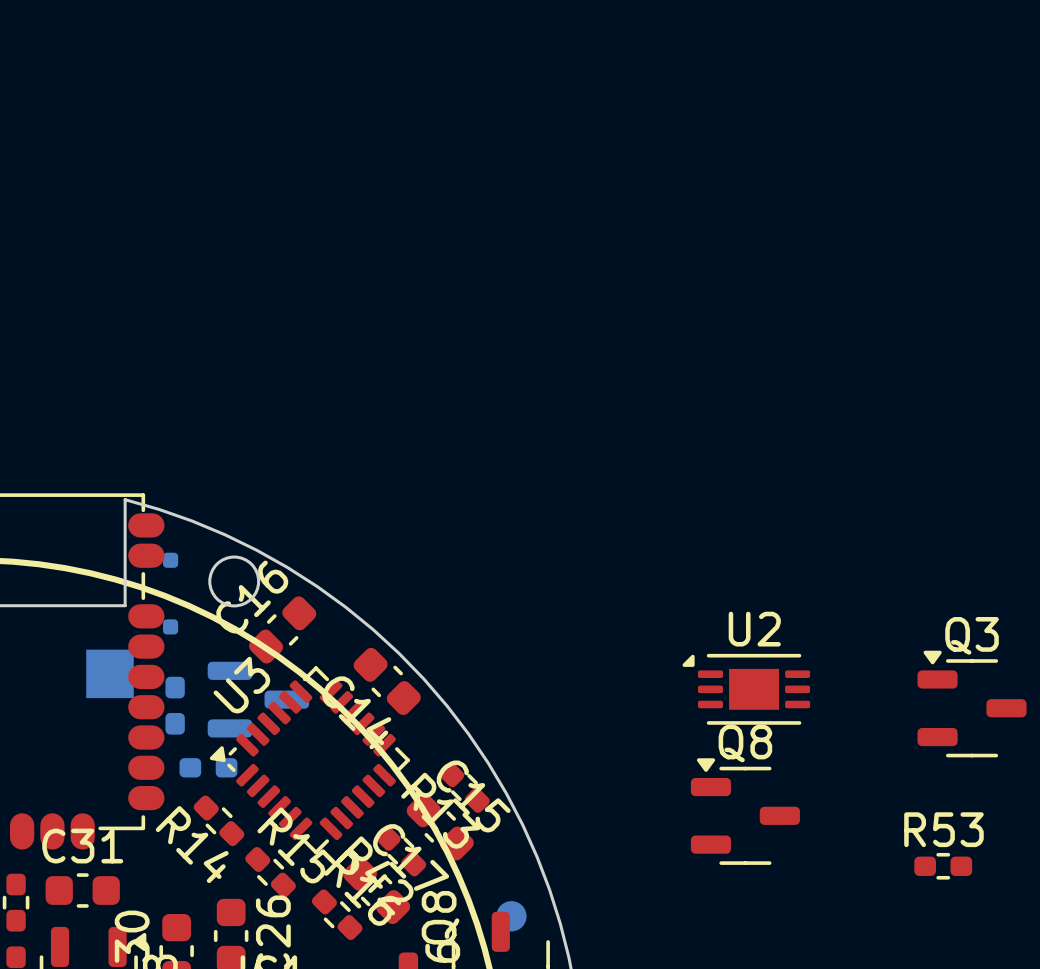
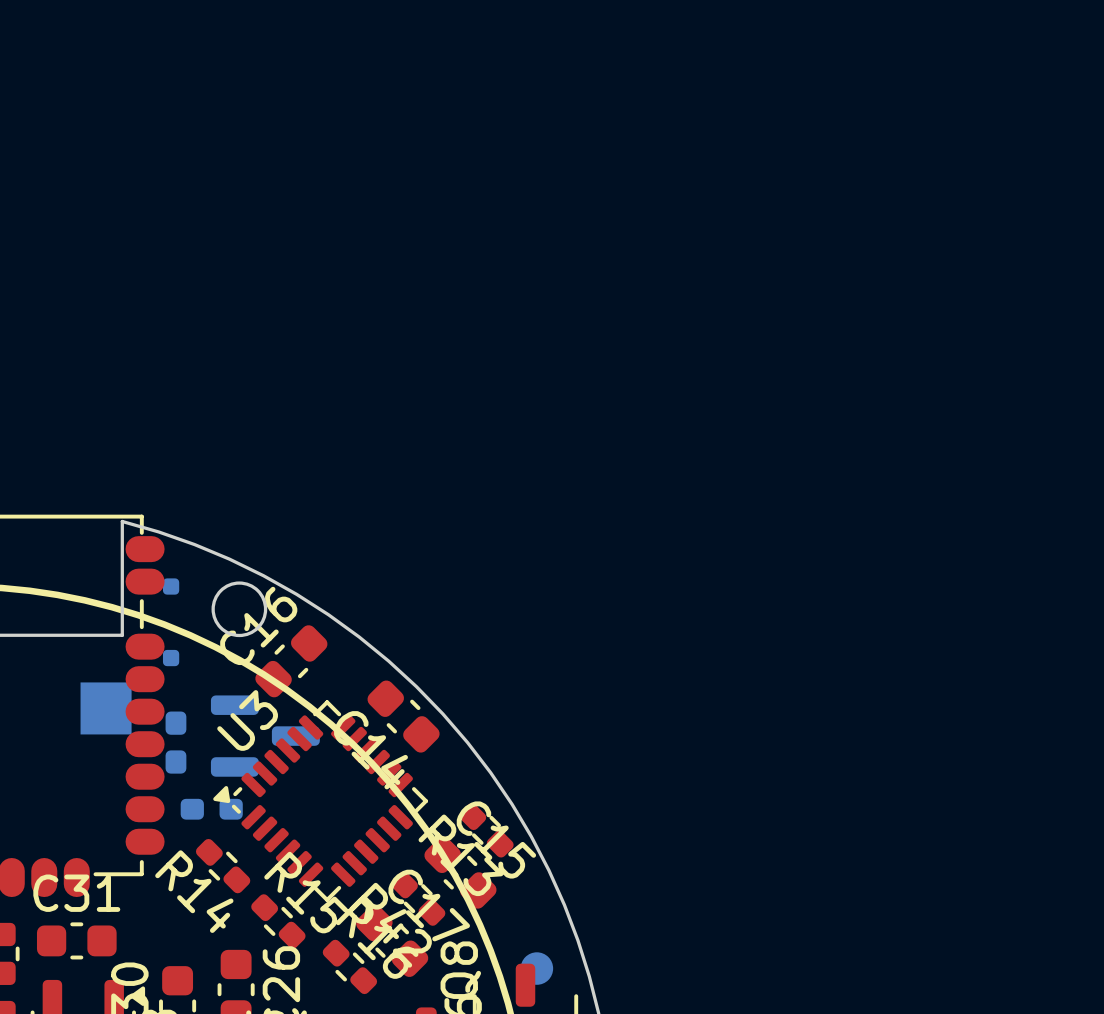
U2: (746, 689) -> none
Q3: (972, 704) -> none
Q8: (745, 811) -> none
R53: (943, 866) -> none

